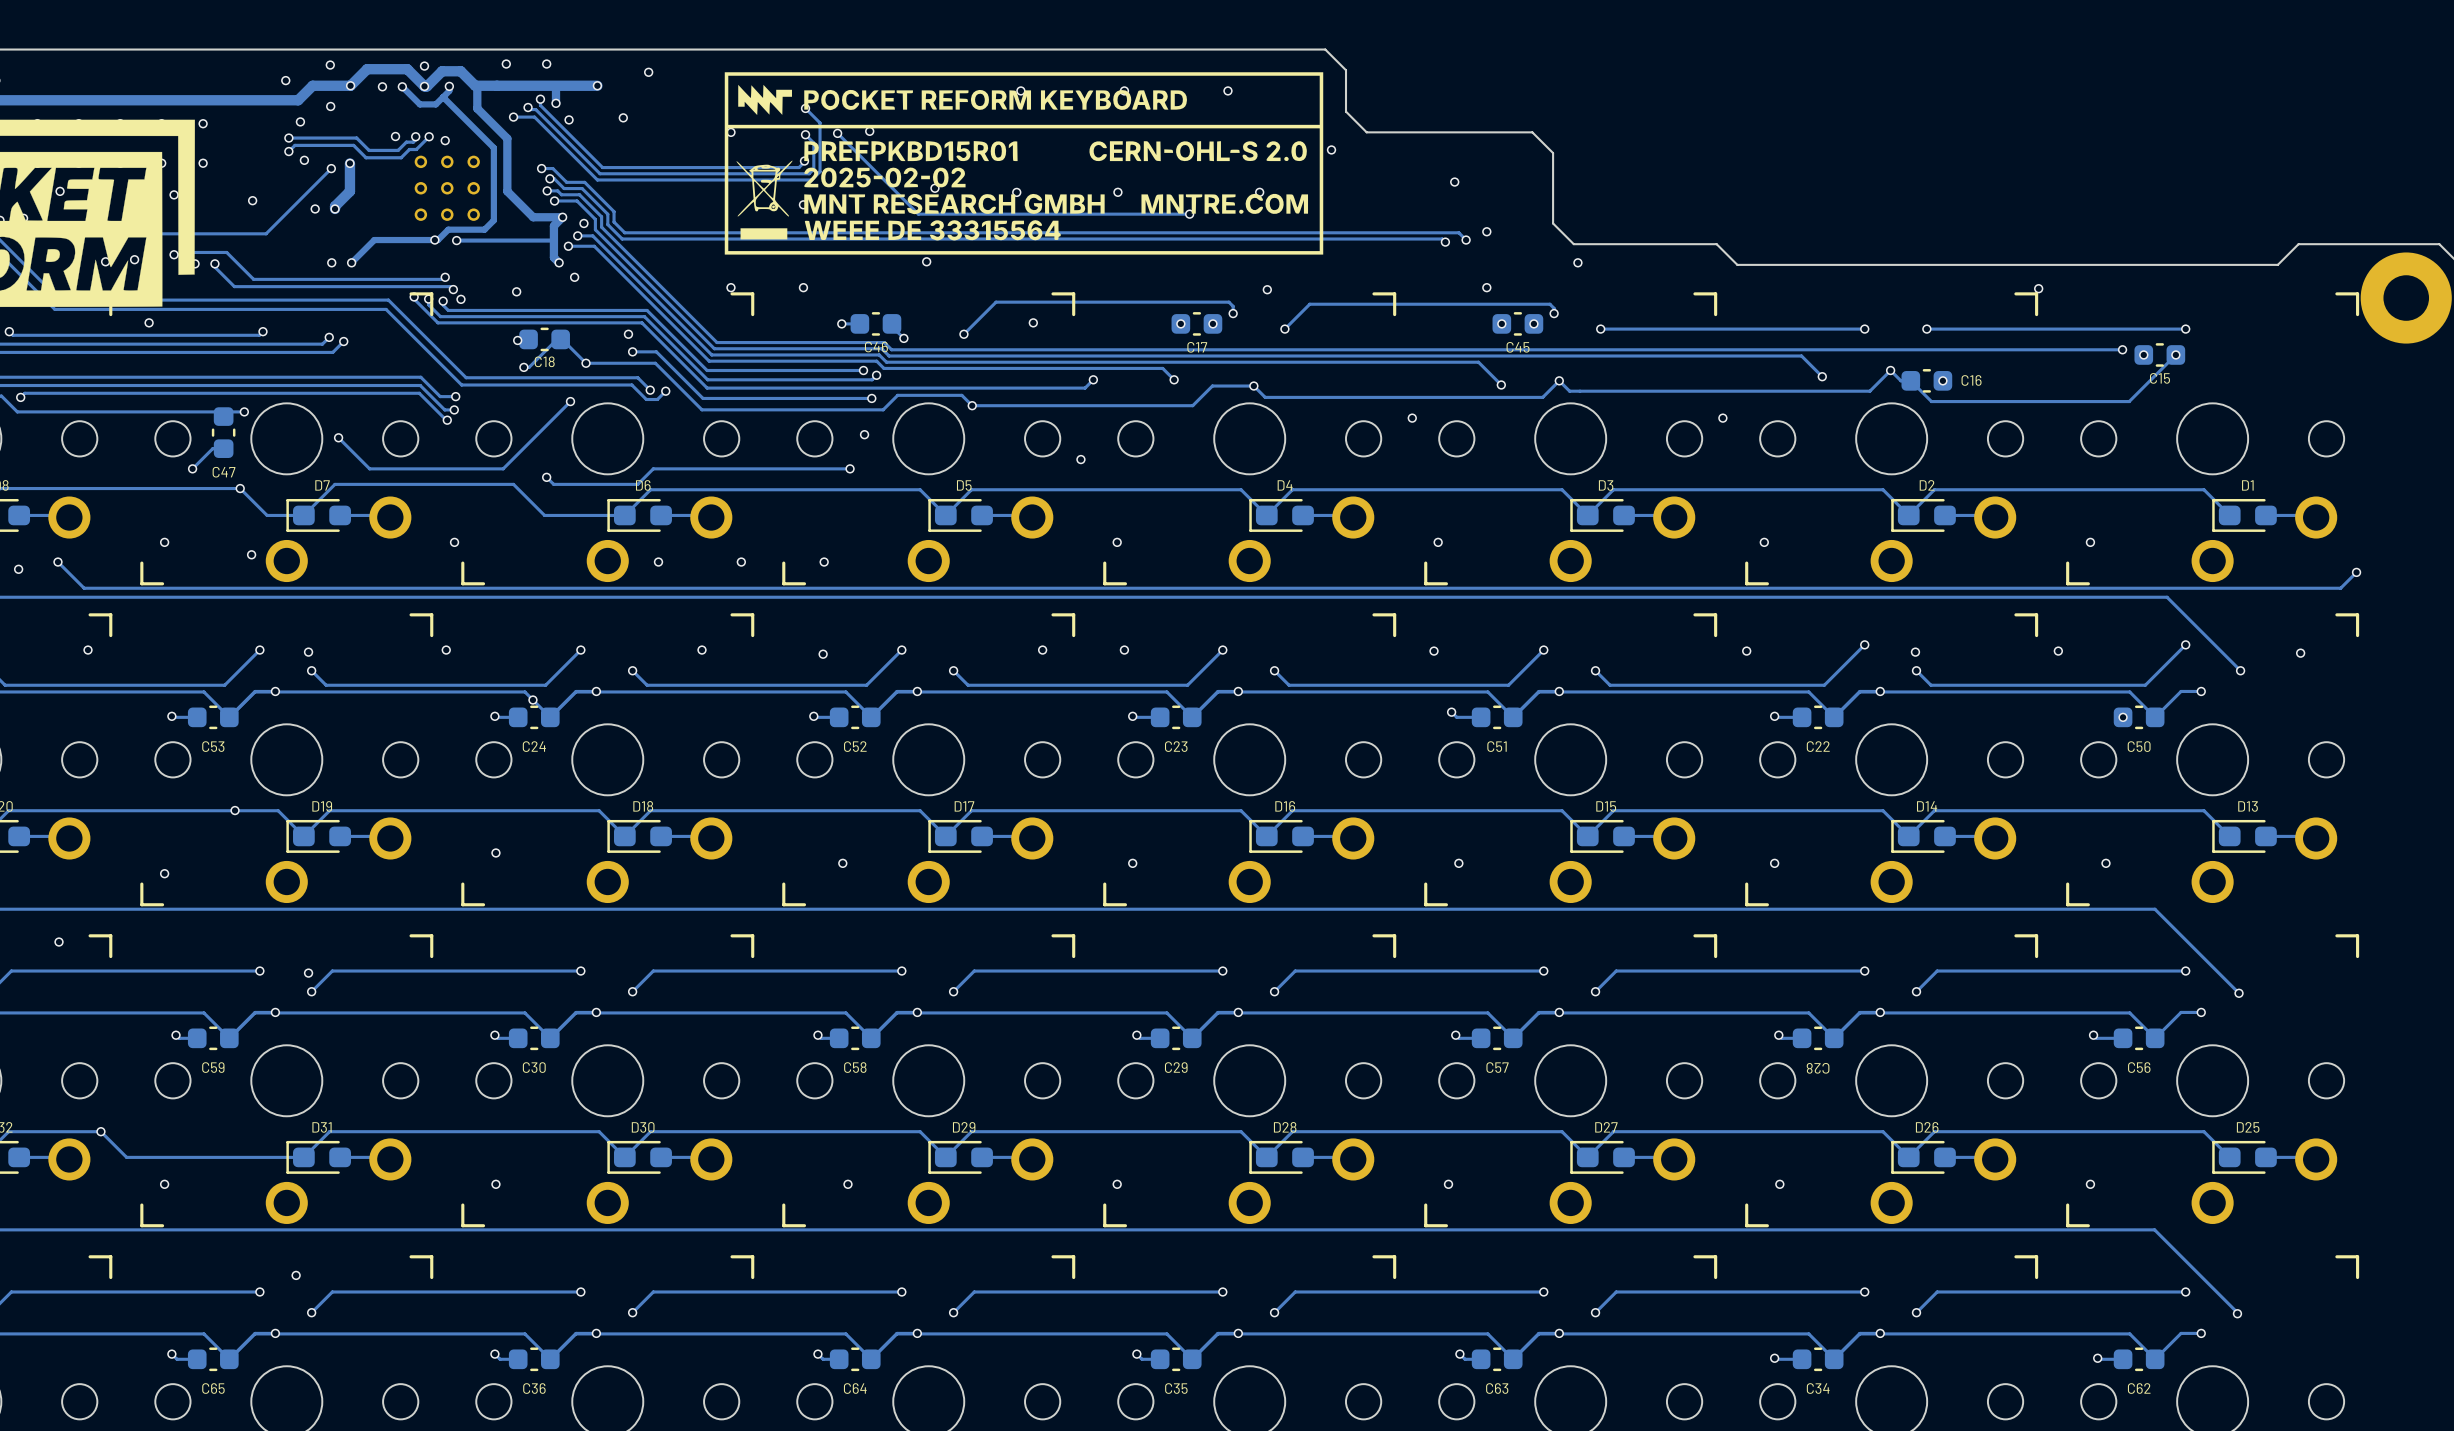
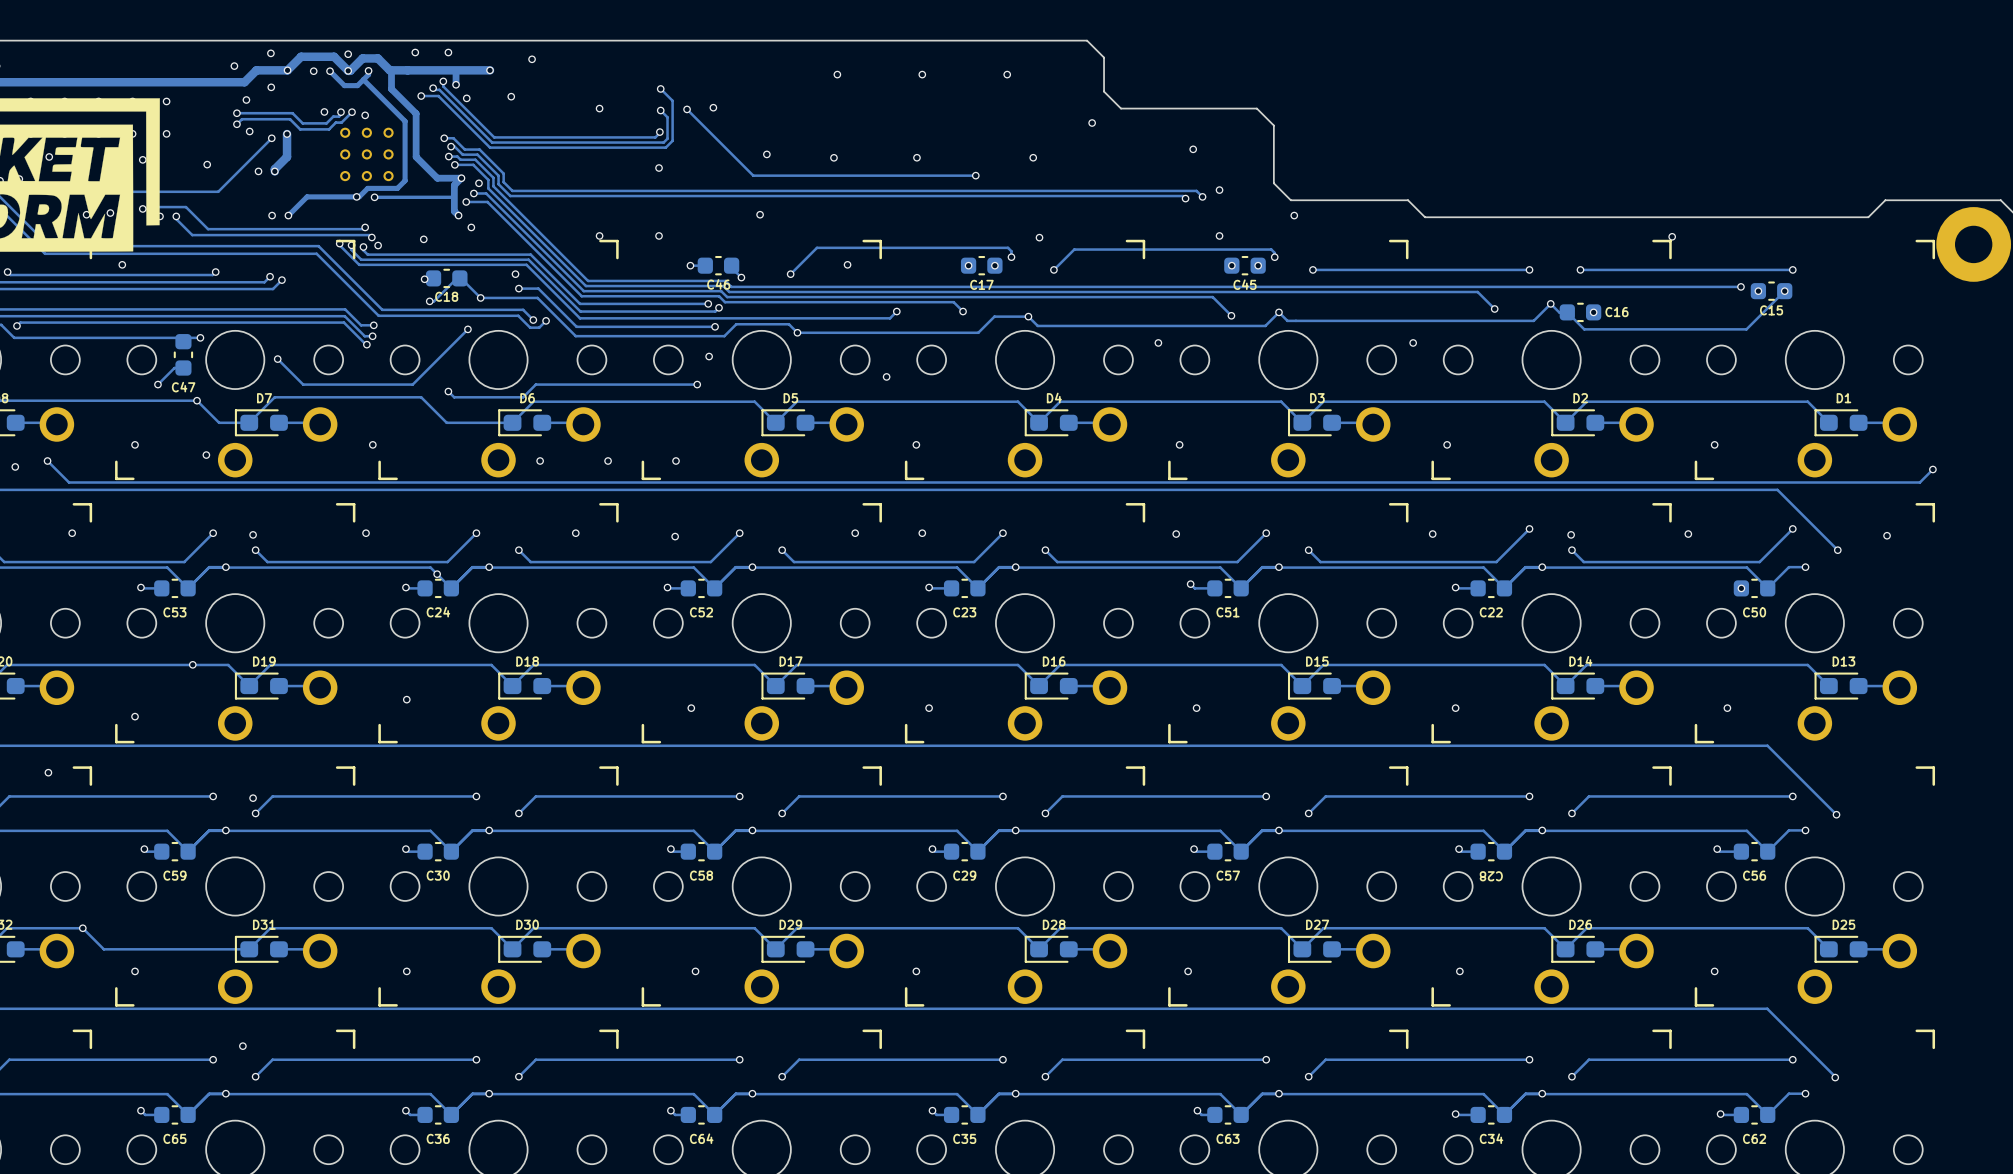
drawing: [724, 72, 1324, 255] -> none

